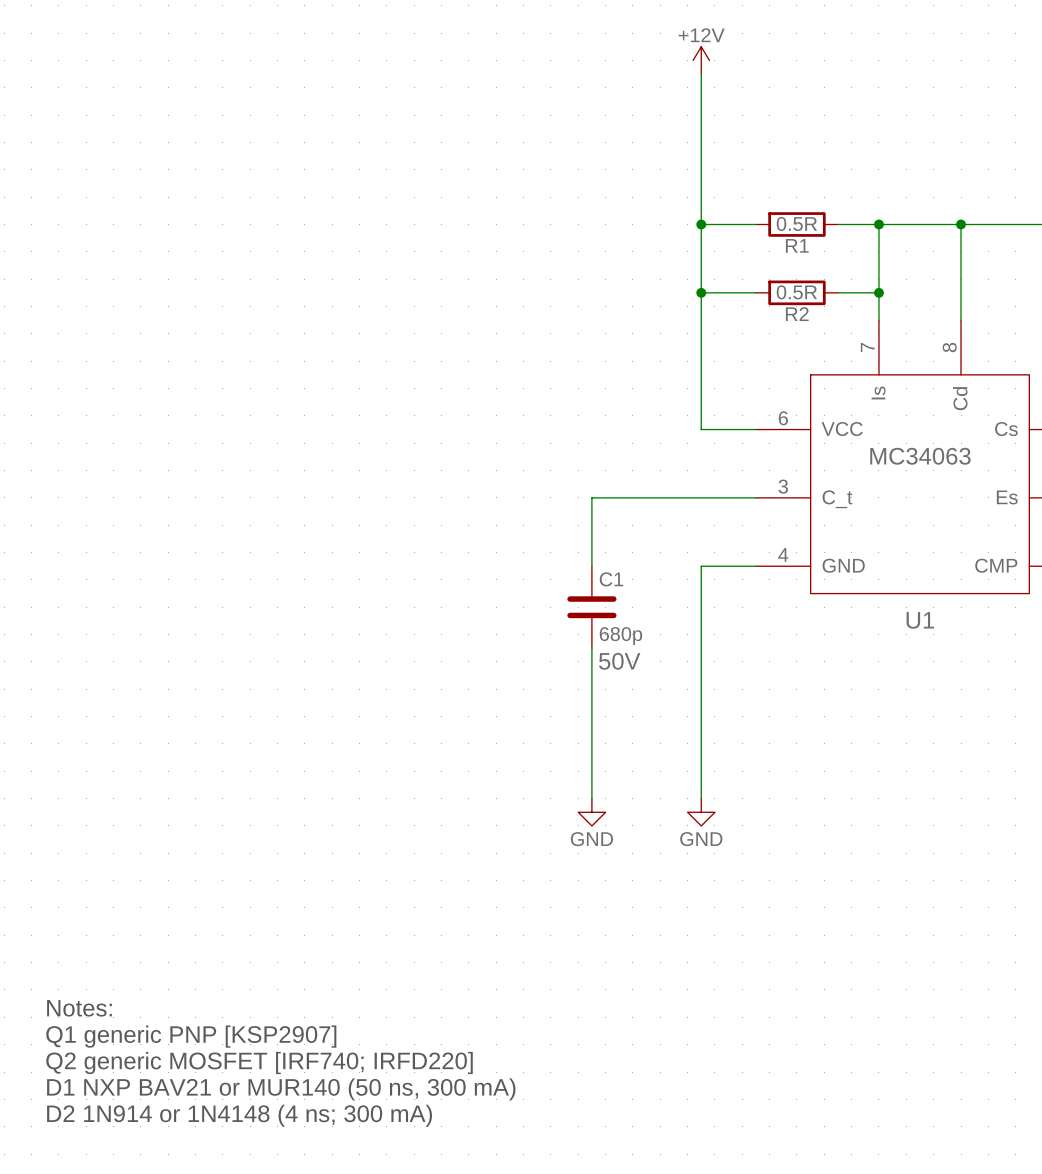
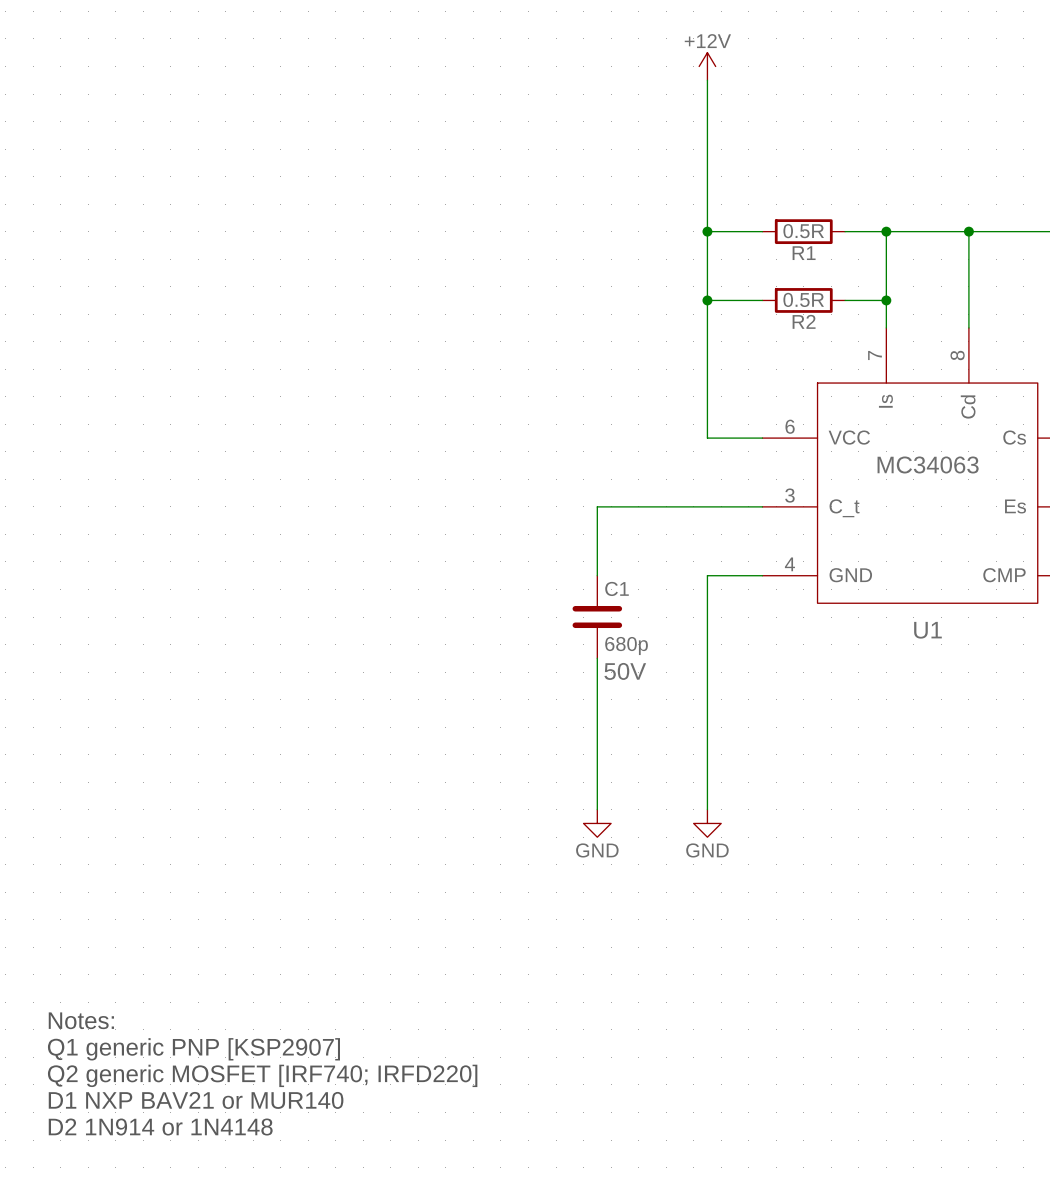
text: D1 NXP BAV21 or MUR140 (50 ns, 300 mA) (281, 1089) -> D1 NXP BAV21 or MUR140 (196, 1100)
text: D2 1N914 or 1N4148 (4 ns; 300 mA) (239, 1115) -> D2 1N914 or 1N4148 (160, 1127)

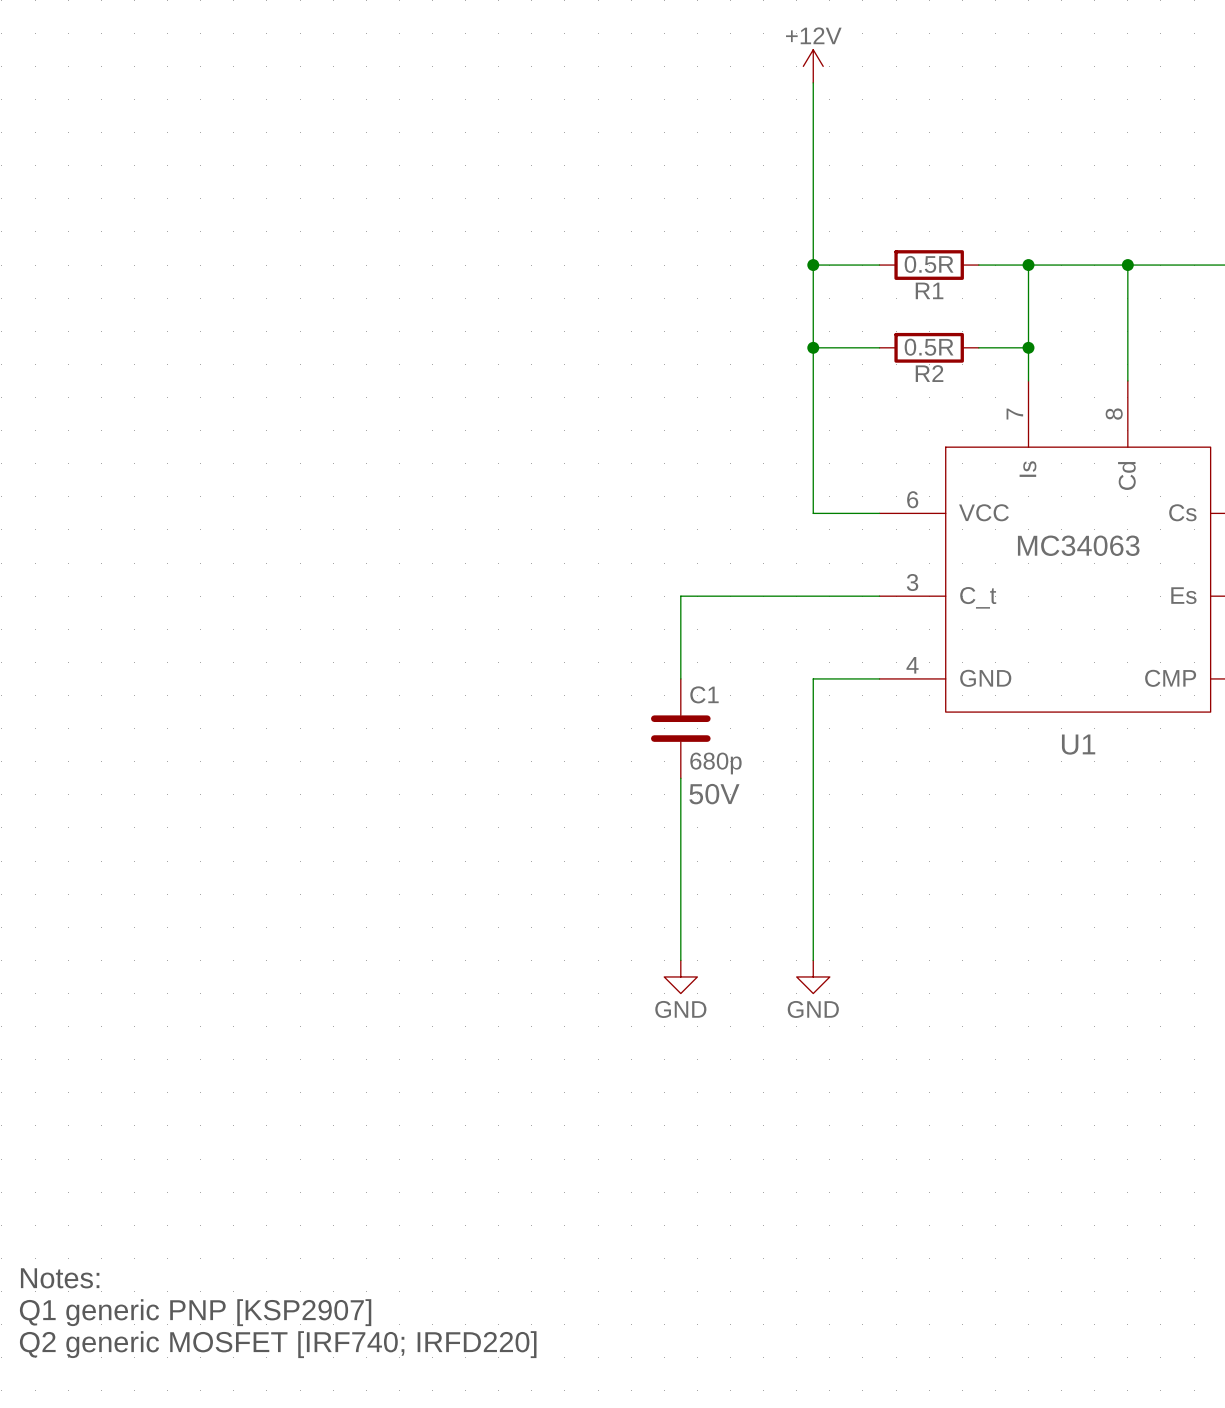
text: Notes: (81, 1020) -> none
text: Q1 generic PNP [KSP2907] (193, 1049) -> none
text: Q2 generic MOSFET [IRF740; IRFD220] (262, 1075) -> Notes: (60, 1278)
text: D1 NXP BAV21 or MUR140 (196, 1100) -> Q1 generic PNP [KSP2907] (195, 1312)
text: D2 1N914 or 1N4148 (160, 1127) -> Q2 generic MOSFET [IRF740; IRFD220] (278, 1344)

